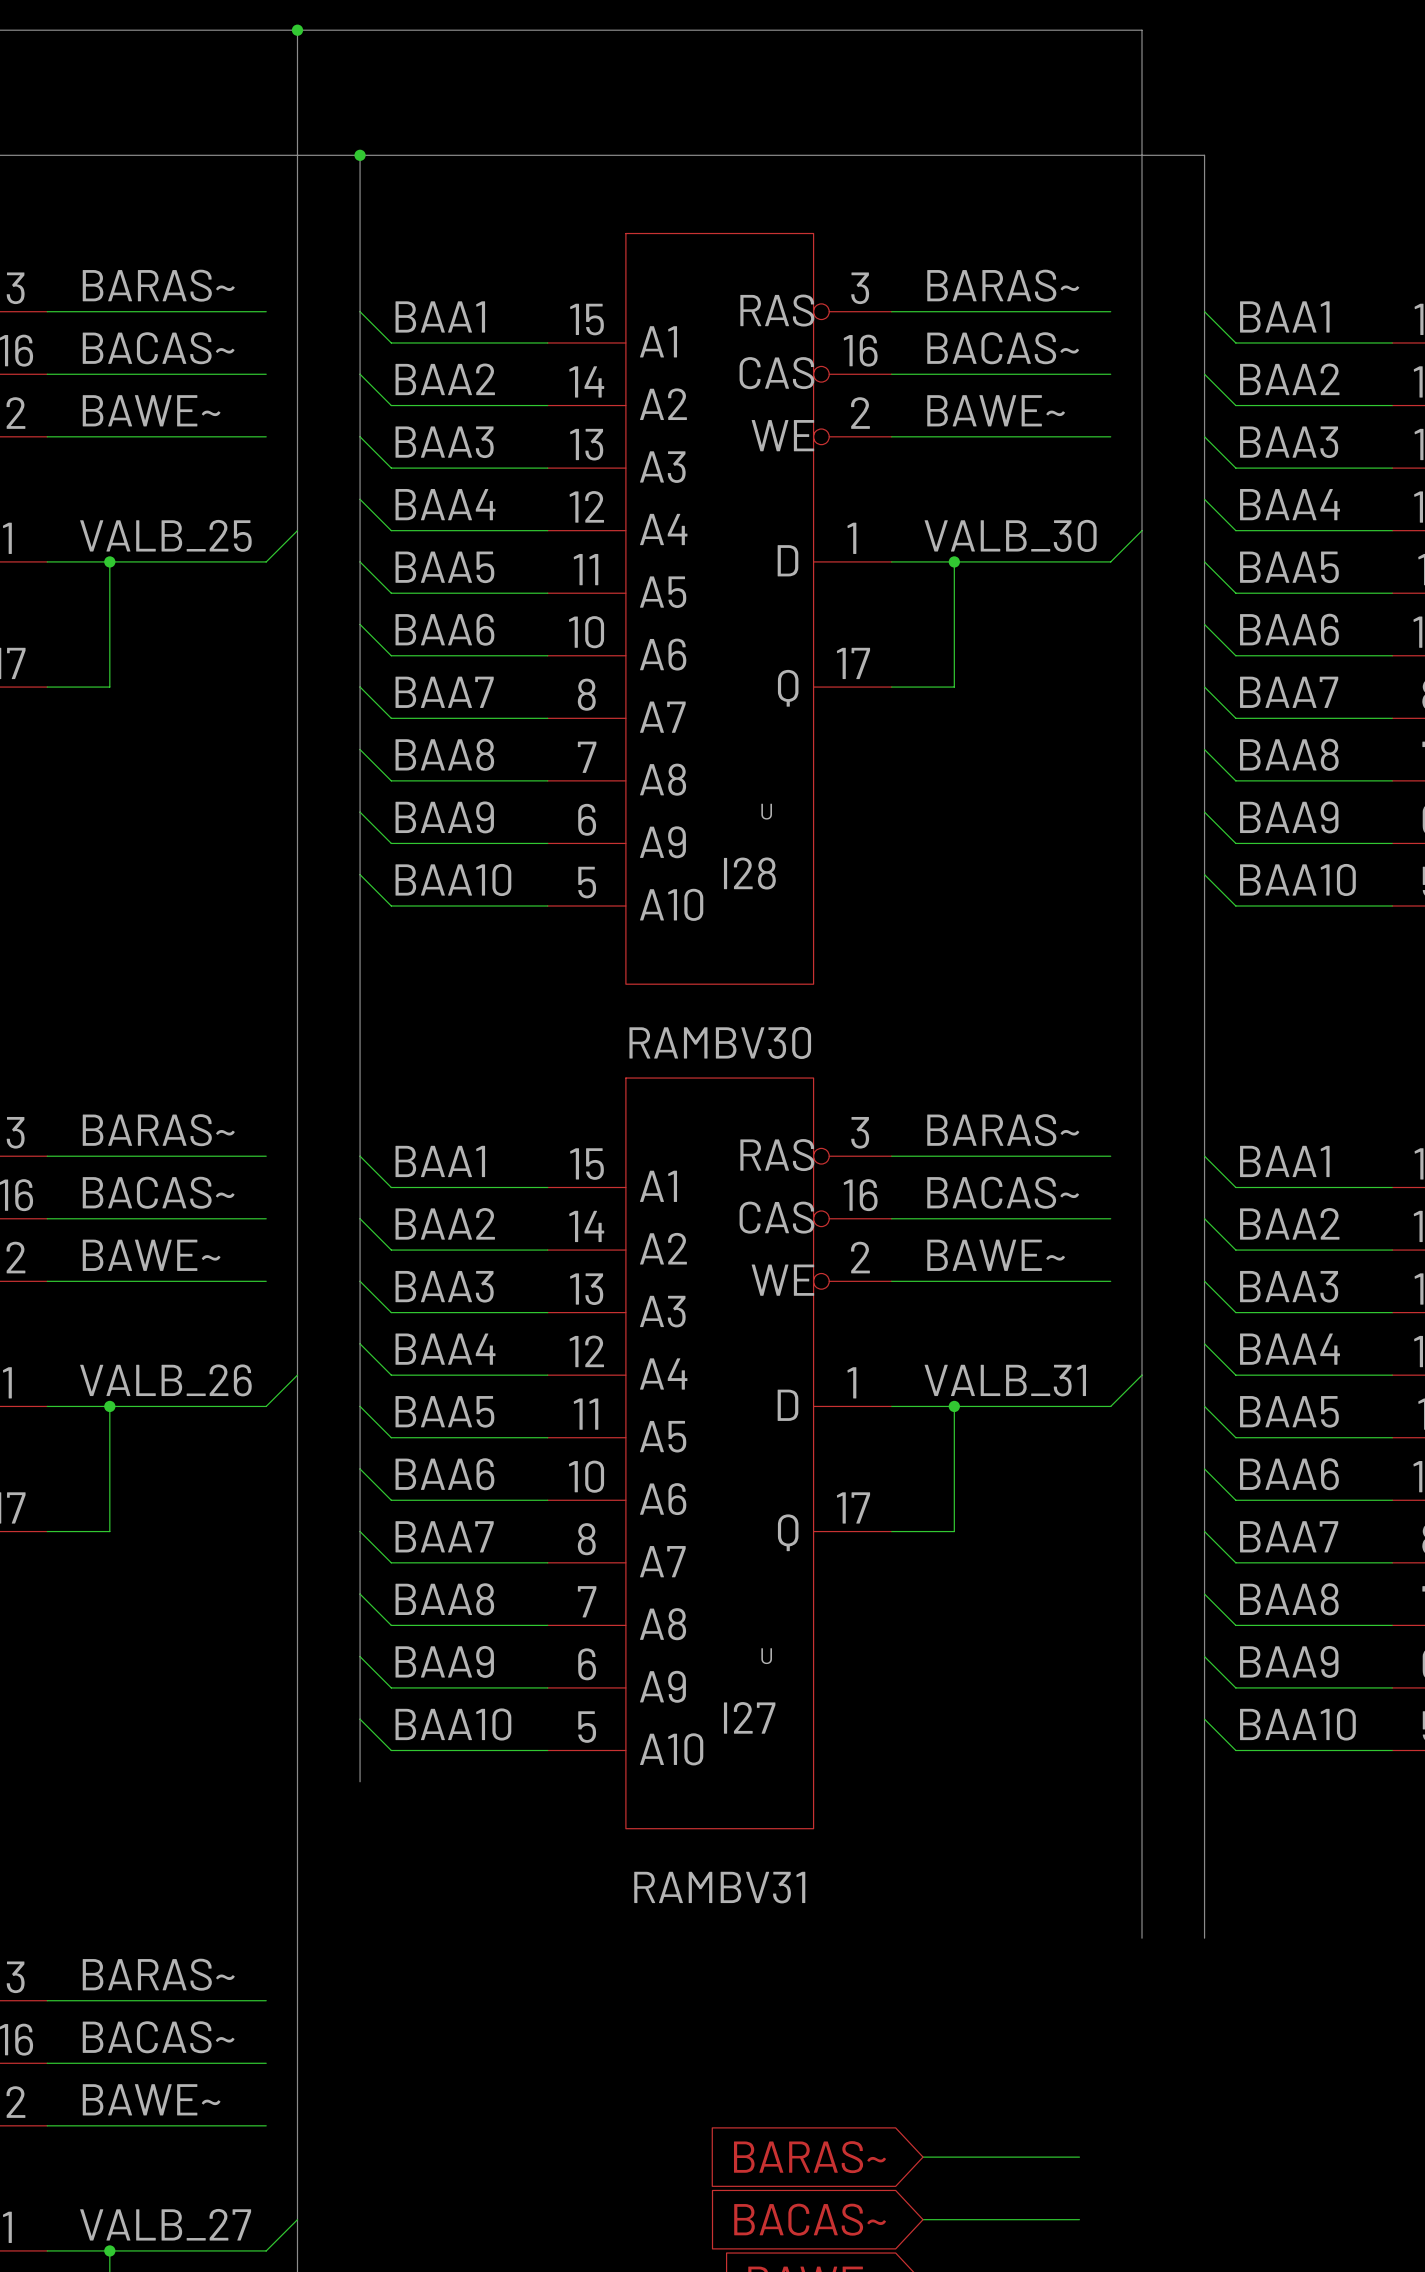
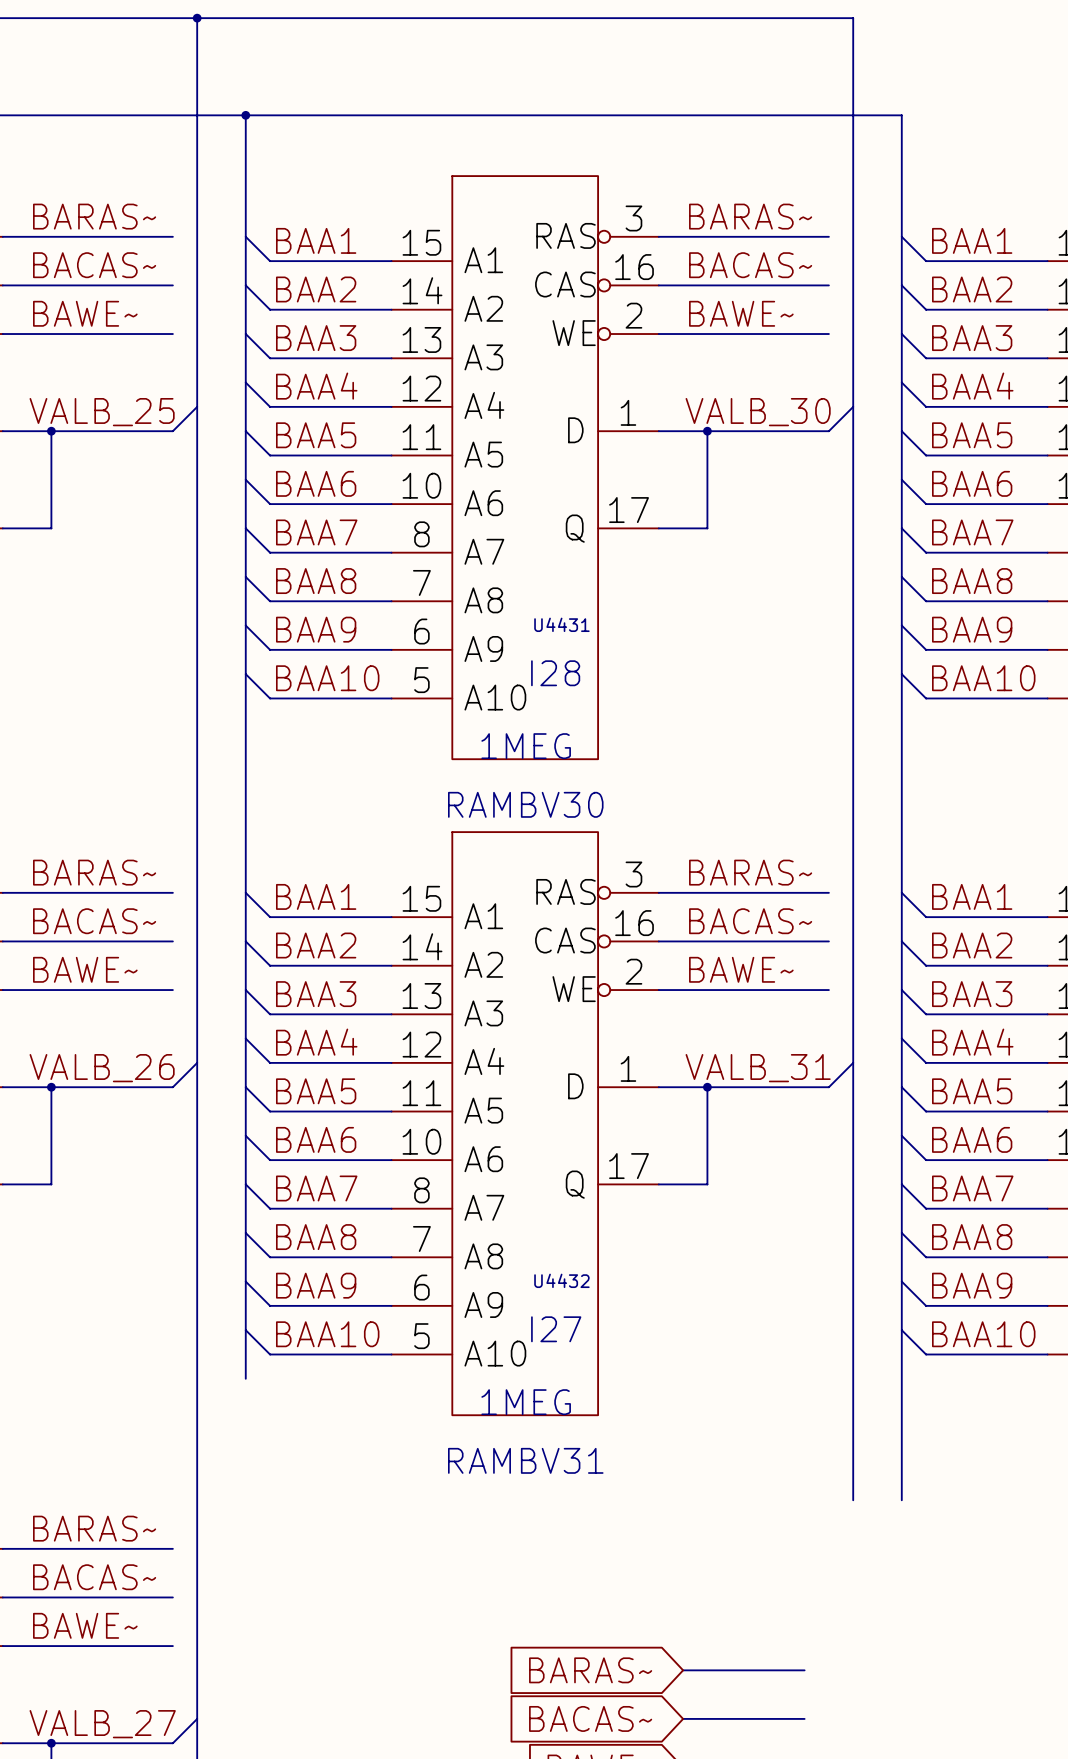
U name: U (766, 811) -> U4431 (561, 624)
U value: none -> 1MEG (526, 746)
U name: U (766, 1656) -> U4432 (561, 1280)
U value: none -> 1MEG (526, 1402)

